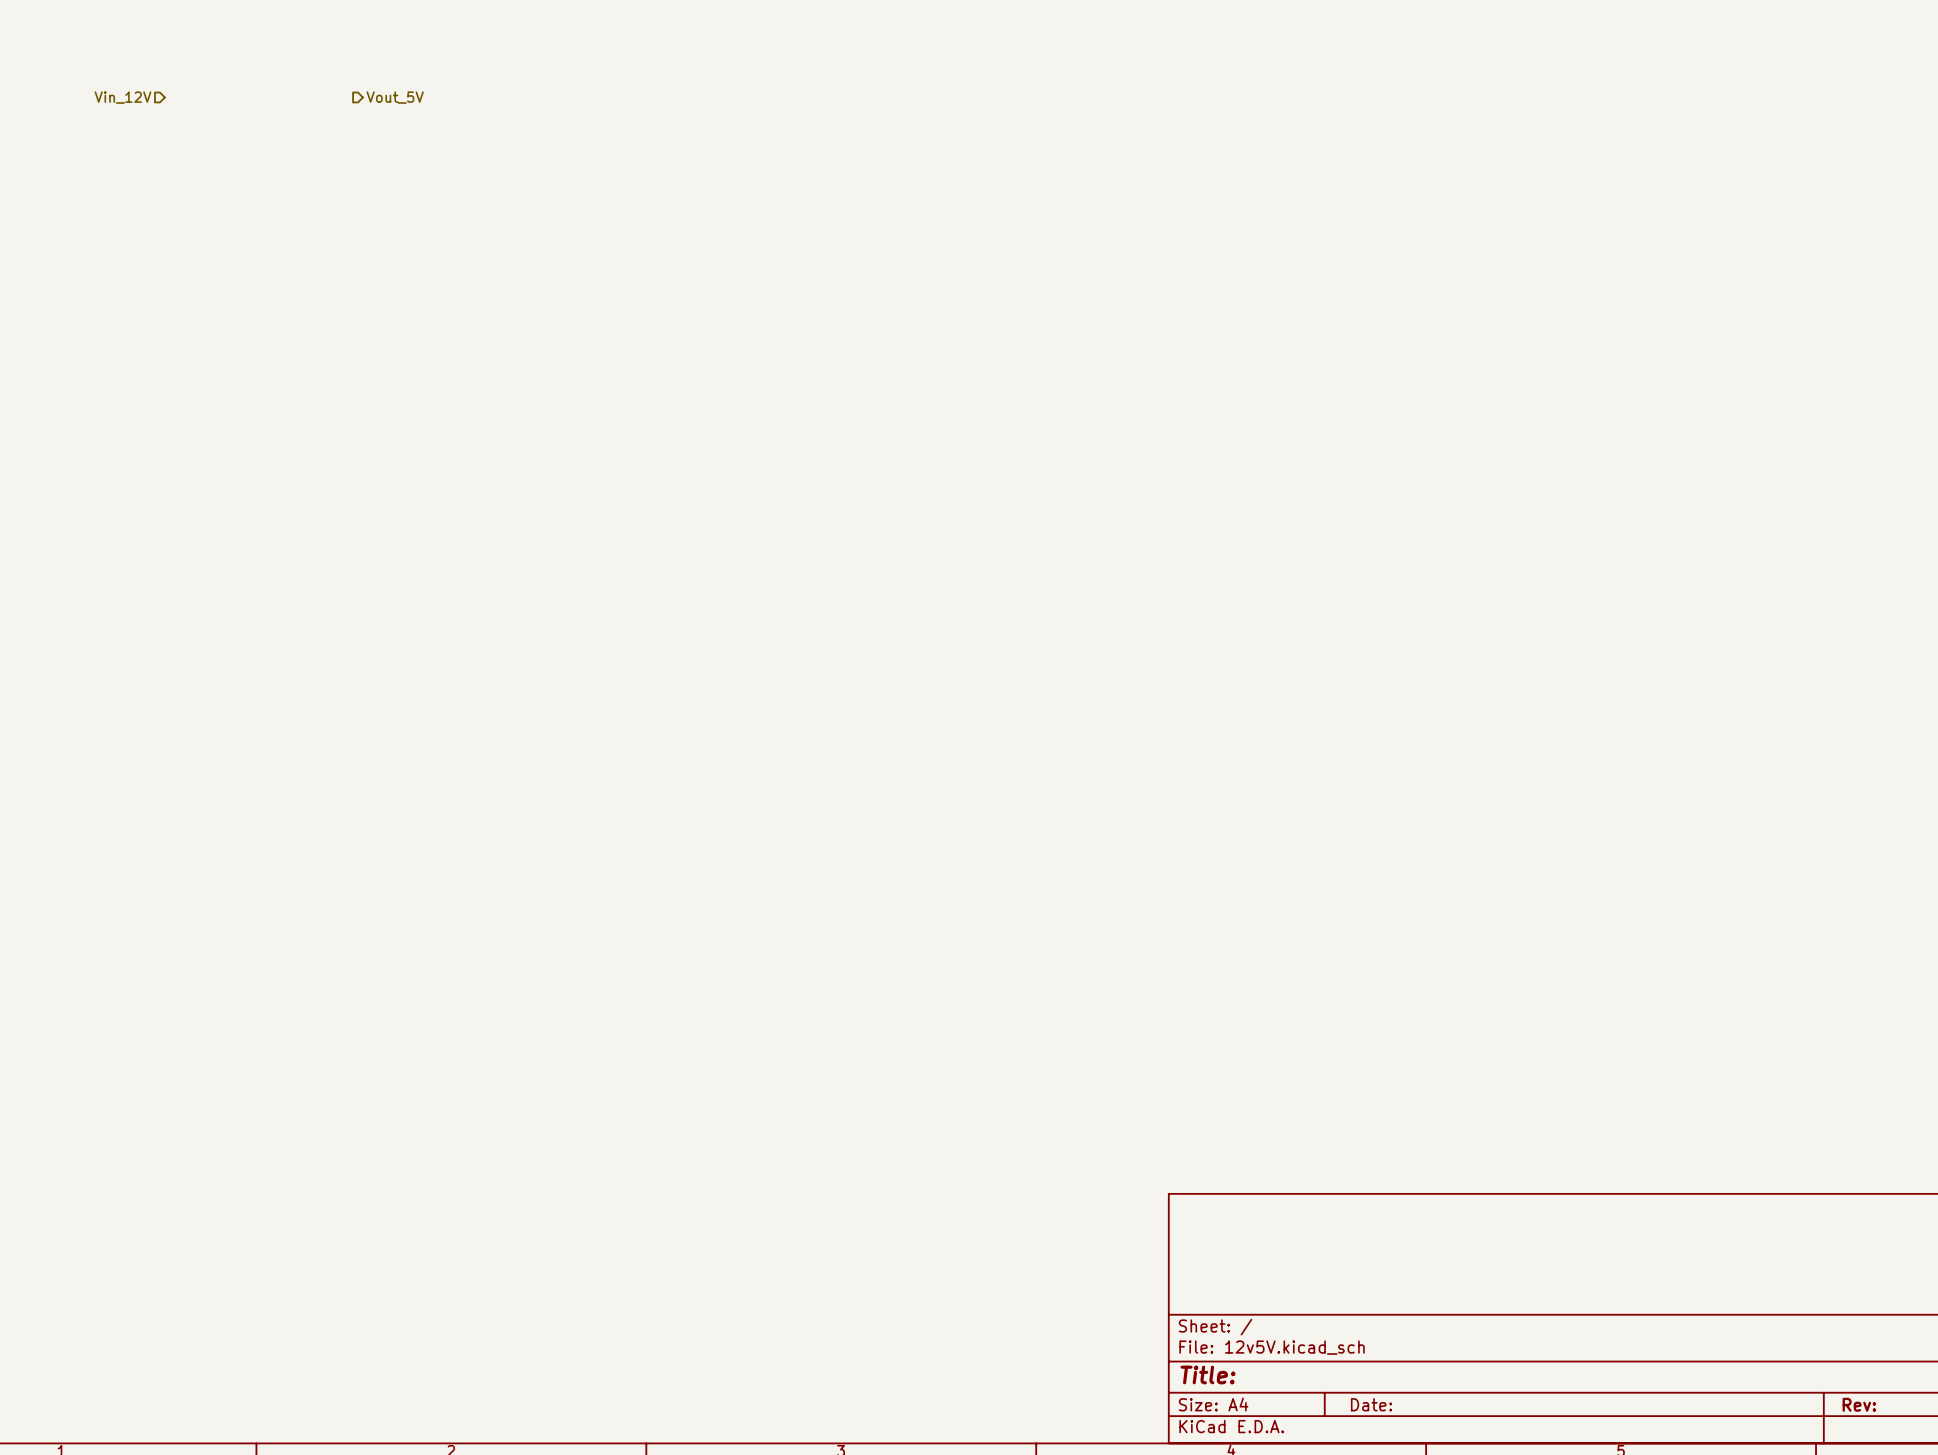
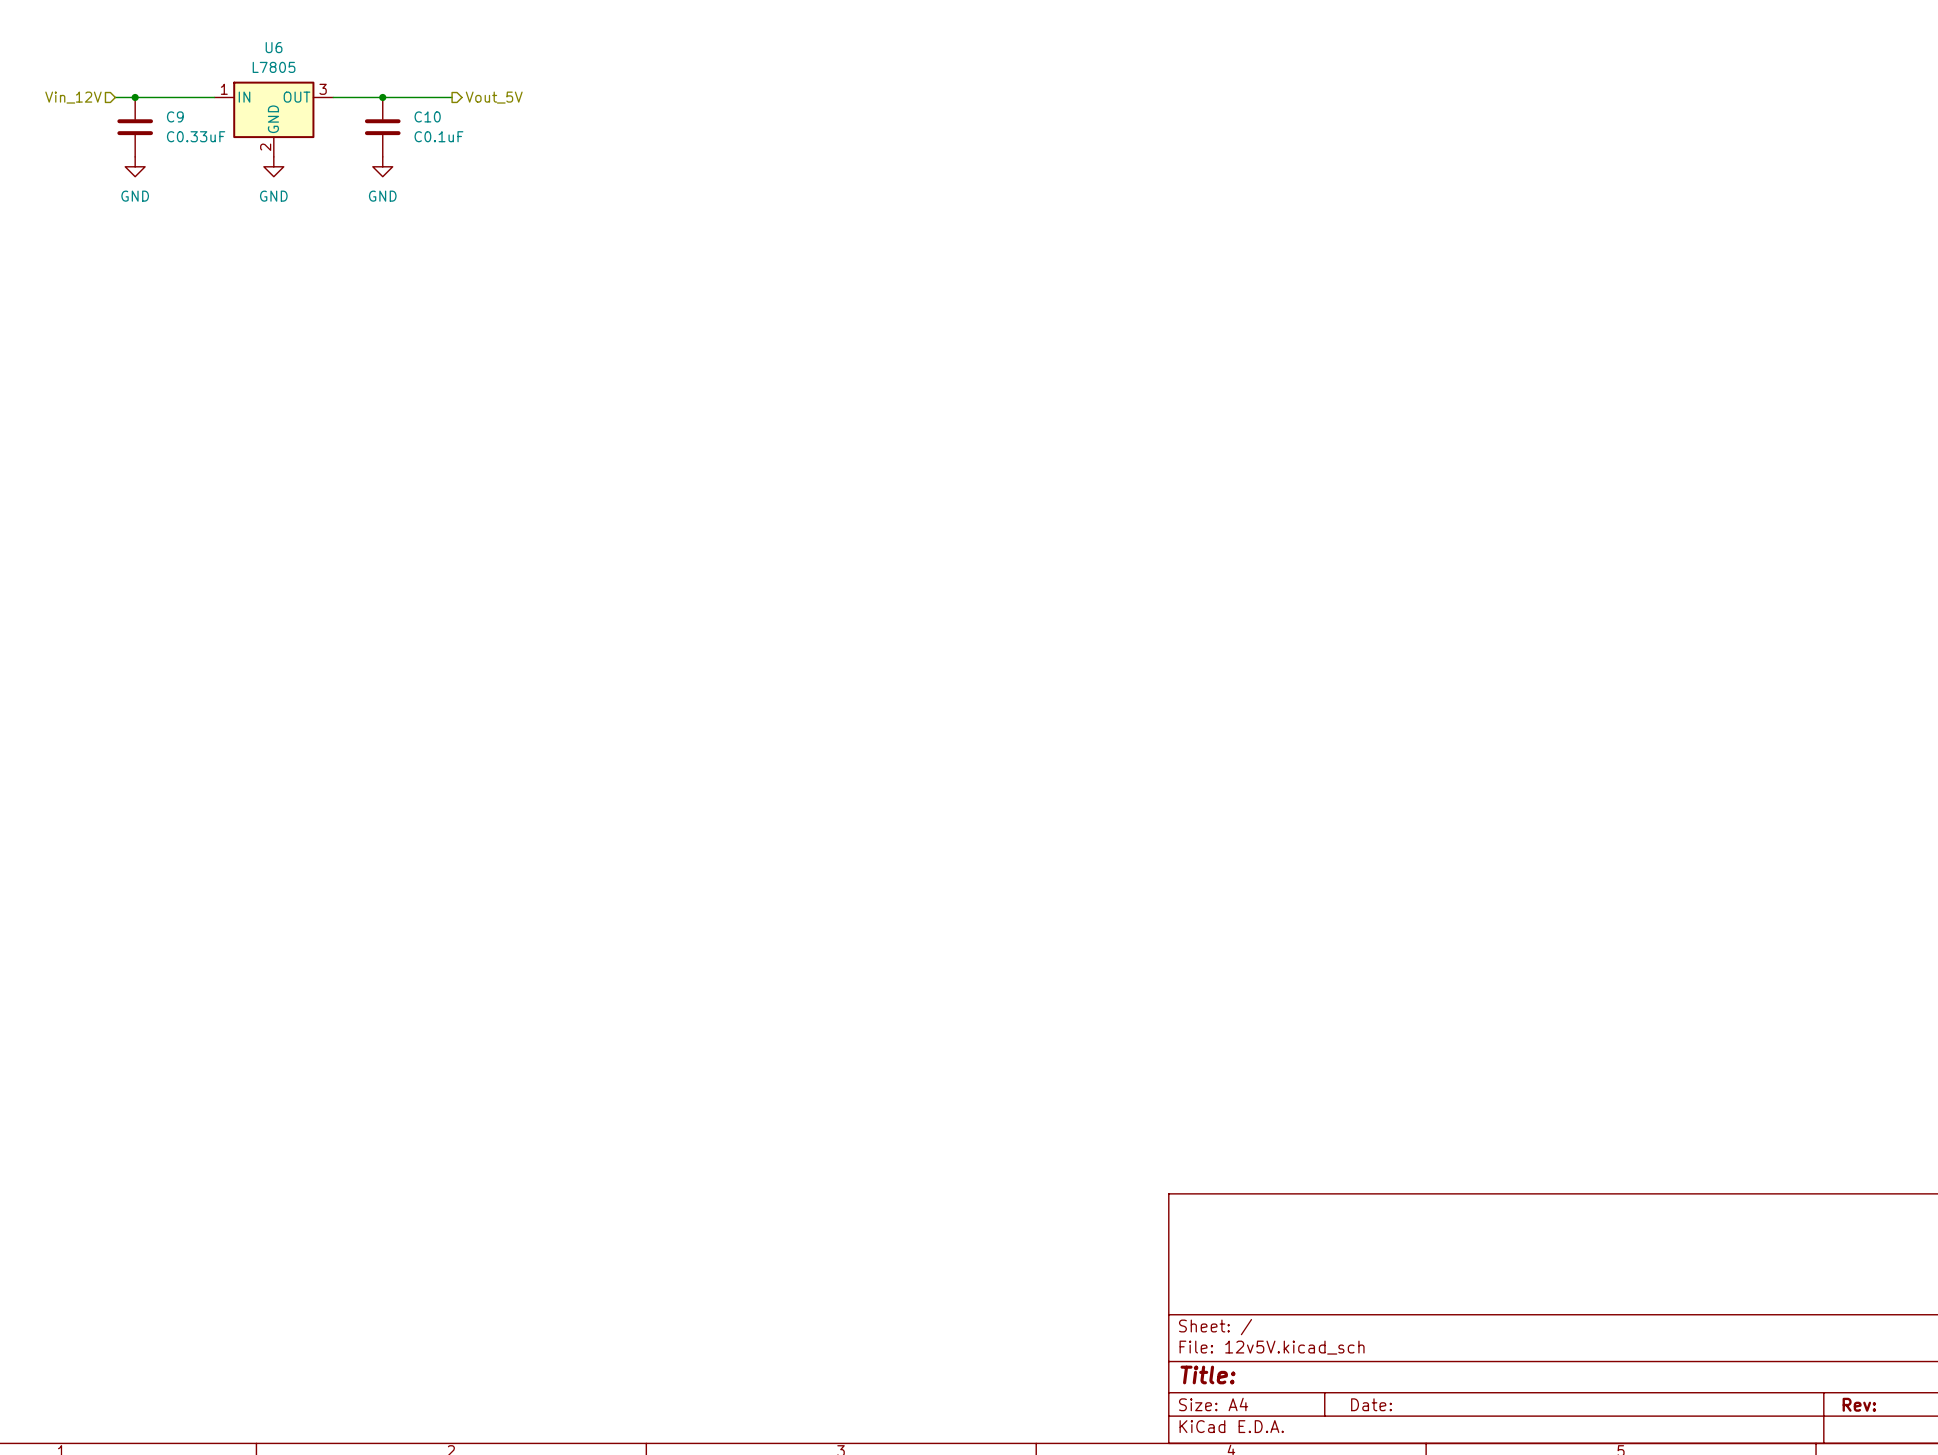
wire: none -> (115, 97) (214, 97)
hierarchical label position: Vin_12V (122, 97) -> Vin_12V (73, 97)
junction: none -> (135, 97)
wire: none -> (333, 97) (452, 97)
junction: none -> (382, 97)
hierarchical label position: Vout_5V (395, 97) -> Vout_5V (494, 97)
U6: none -> L7805 (273, 119)
C9: none -> C0.33uF (135, 127)
C10: none -> C0.1uF (382, 127)
power symbol: none -> GND (135, 166)
power symbol: none -> GND (273, 166)
power symbol: none -> GND (382, 166)

